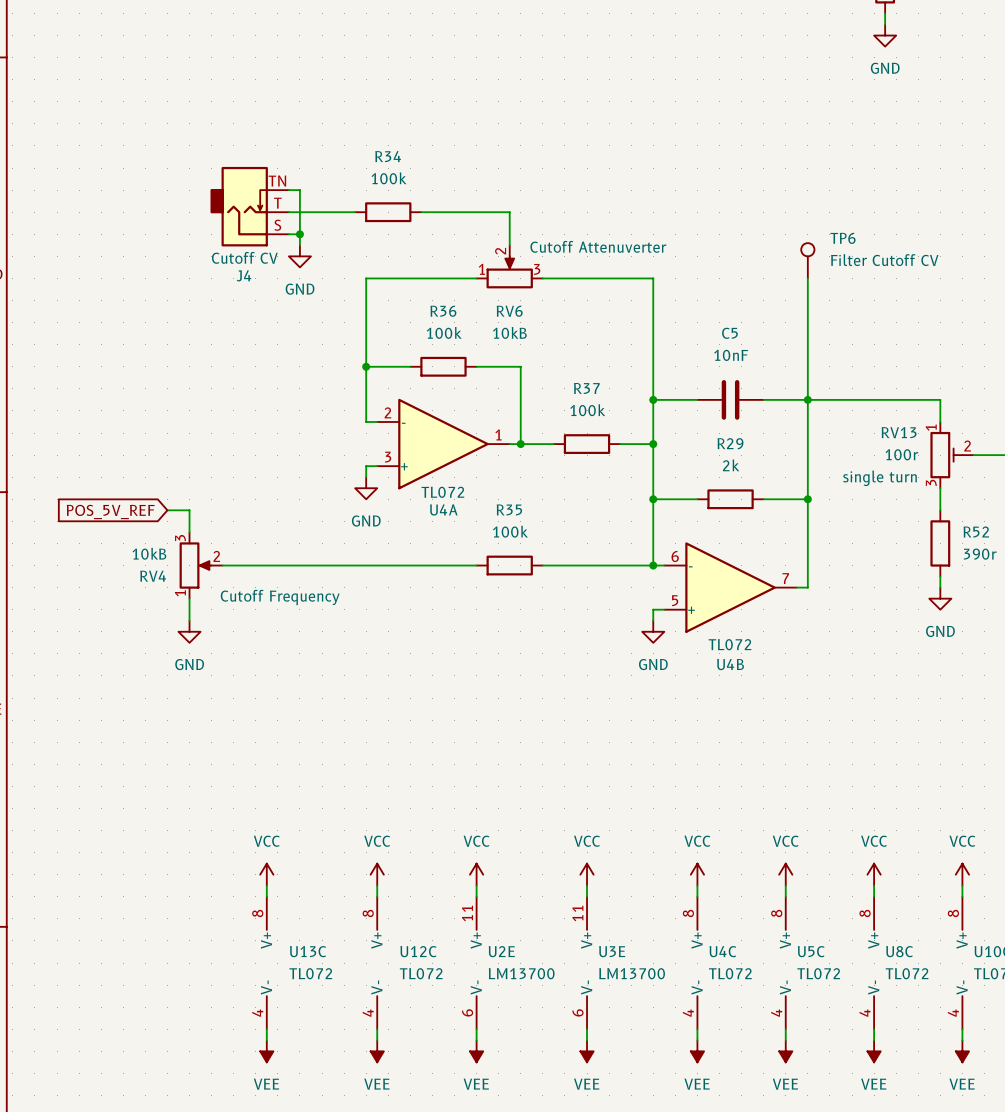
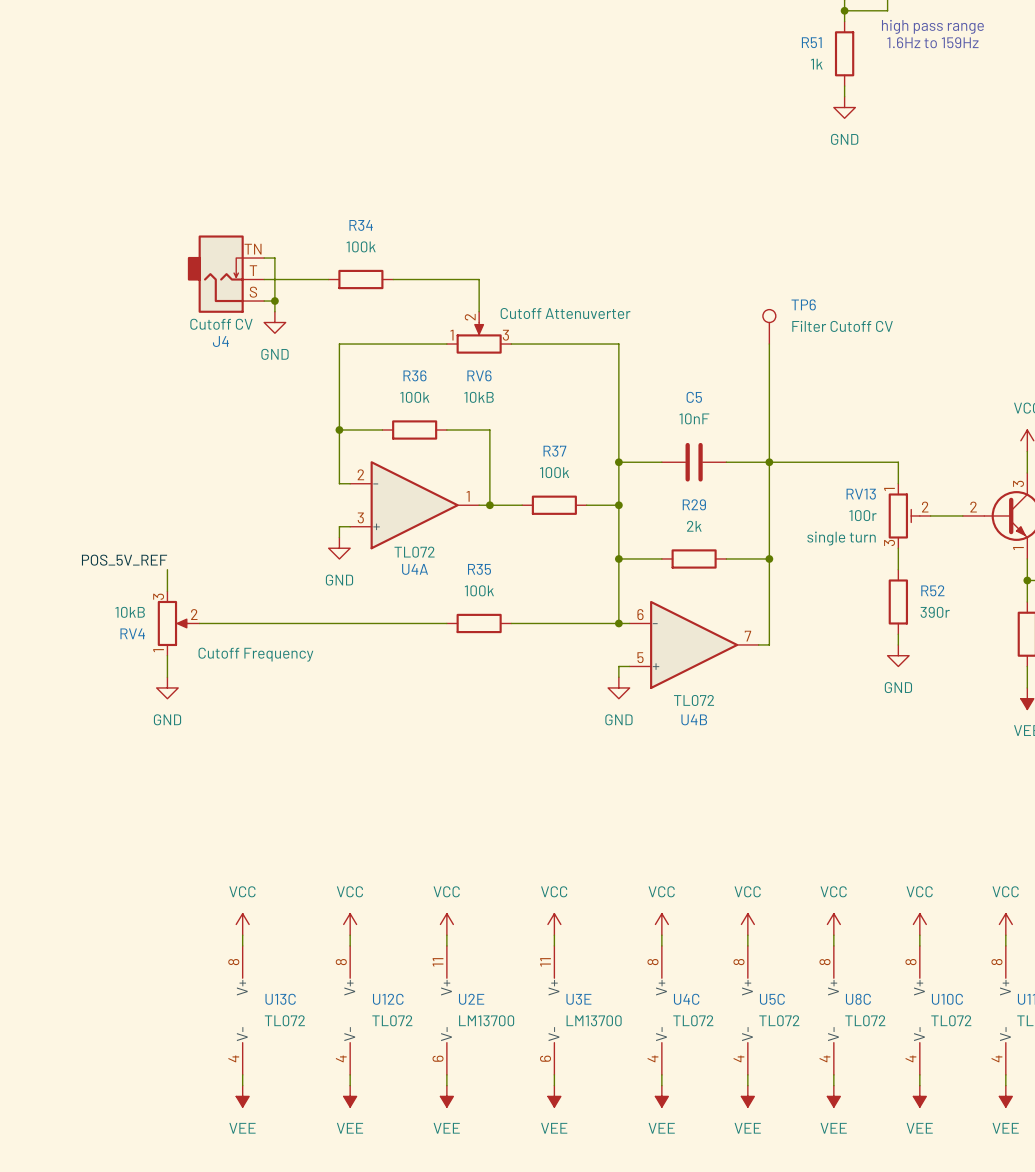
label: none -> POS_5V_REF (124, 560)
wire: (167, 510) (189, 510) -> none
global label: POS_5V_REF (110, 511) -> none

